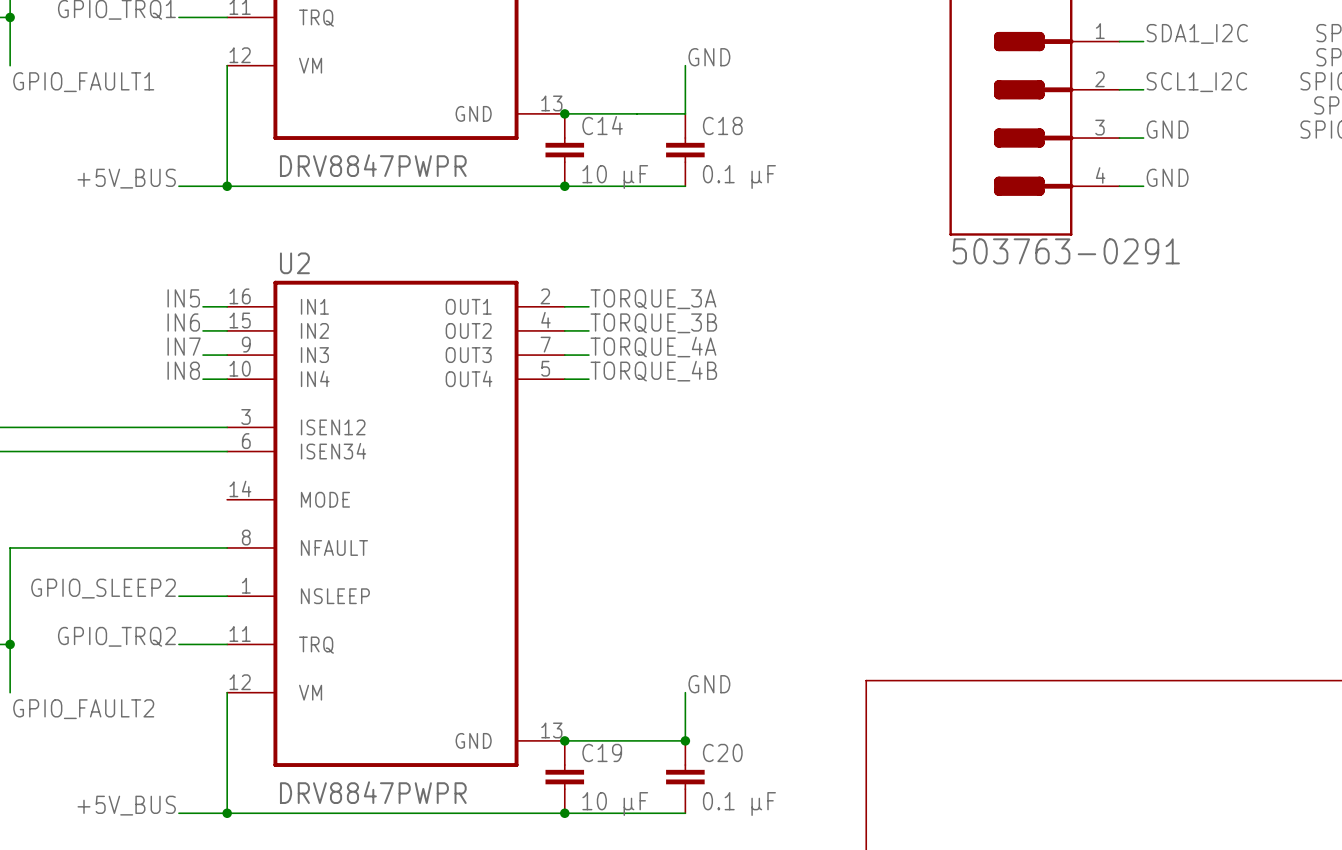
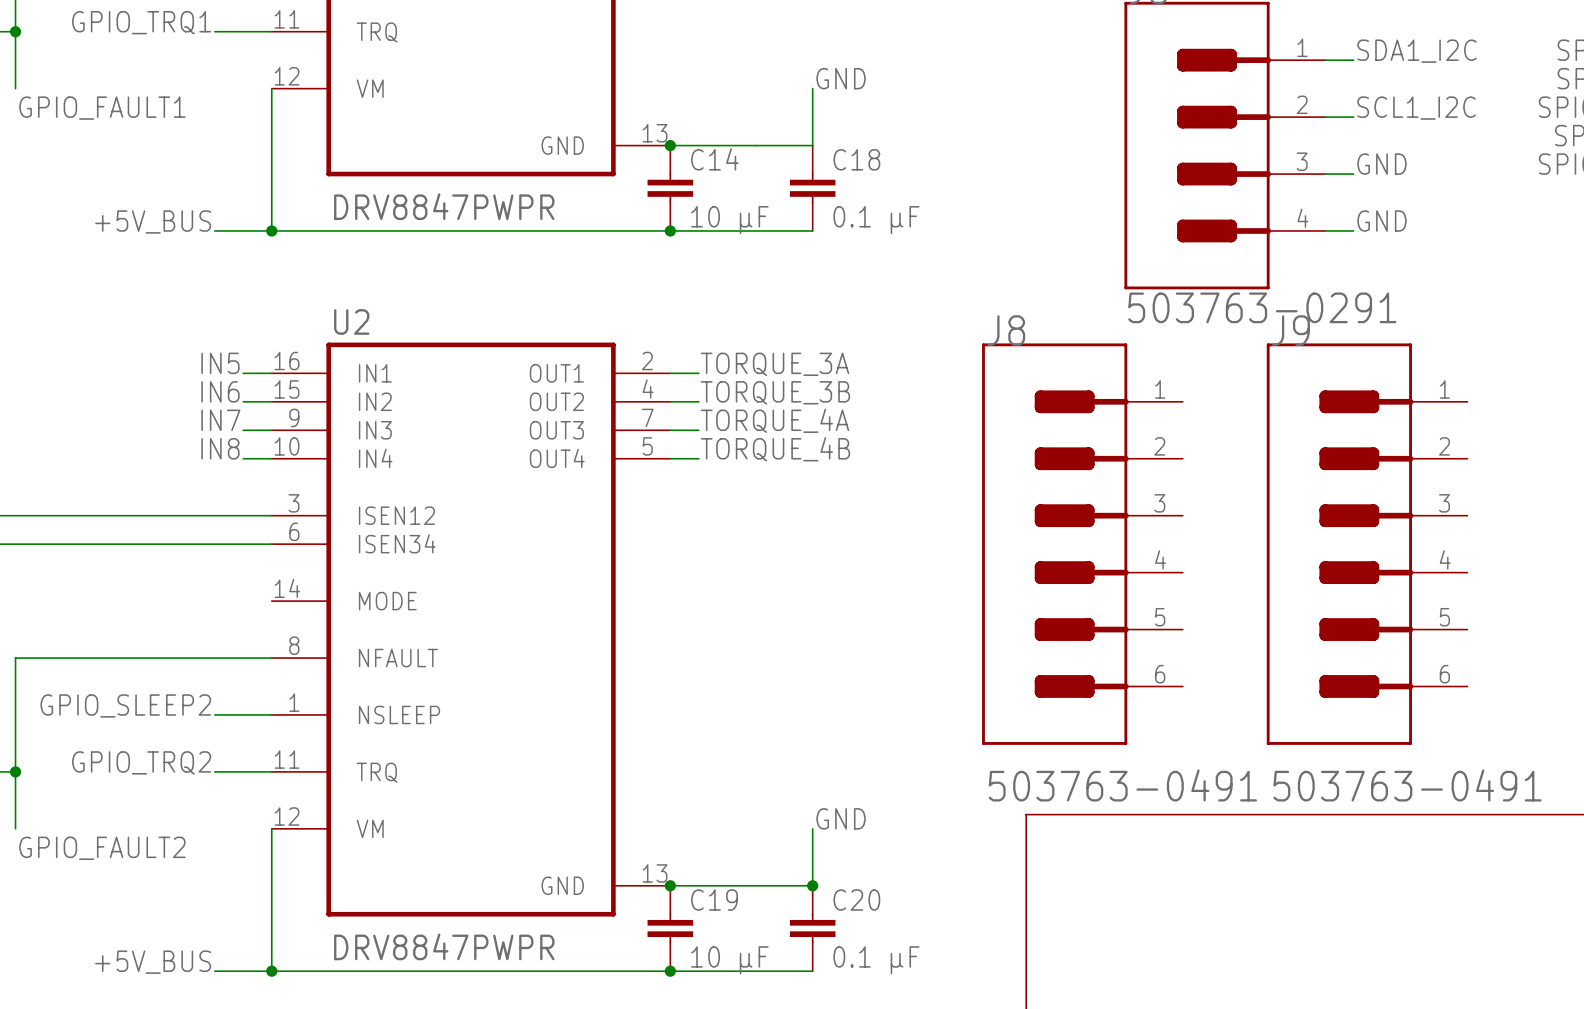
J8: none -> (1082, 544)
J9: none -> (1367, 544)

